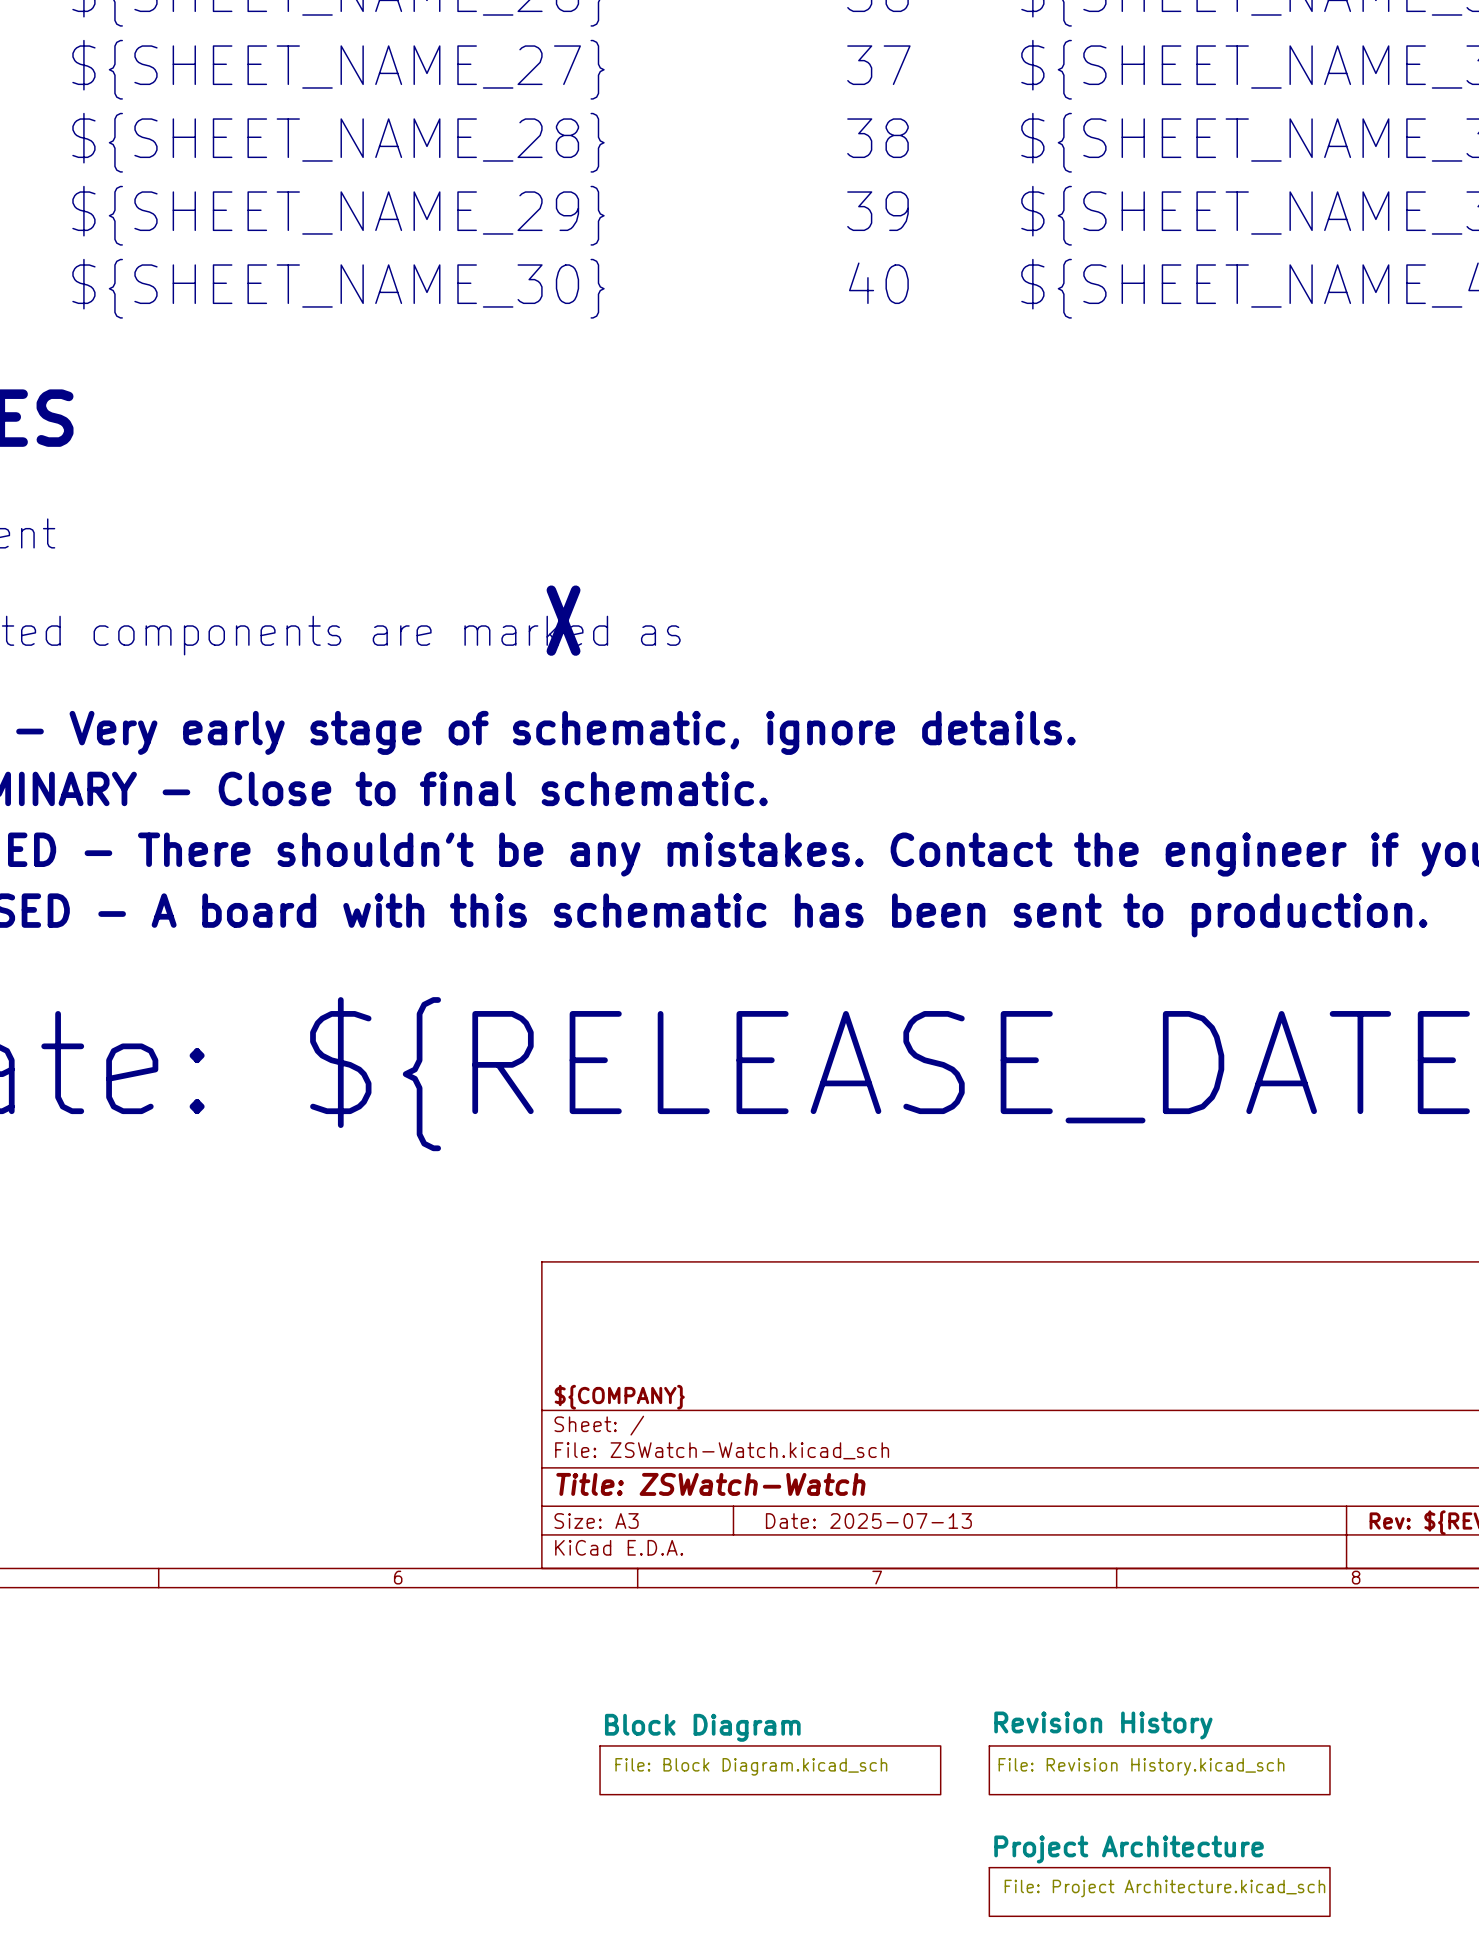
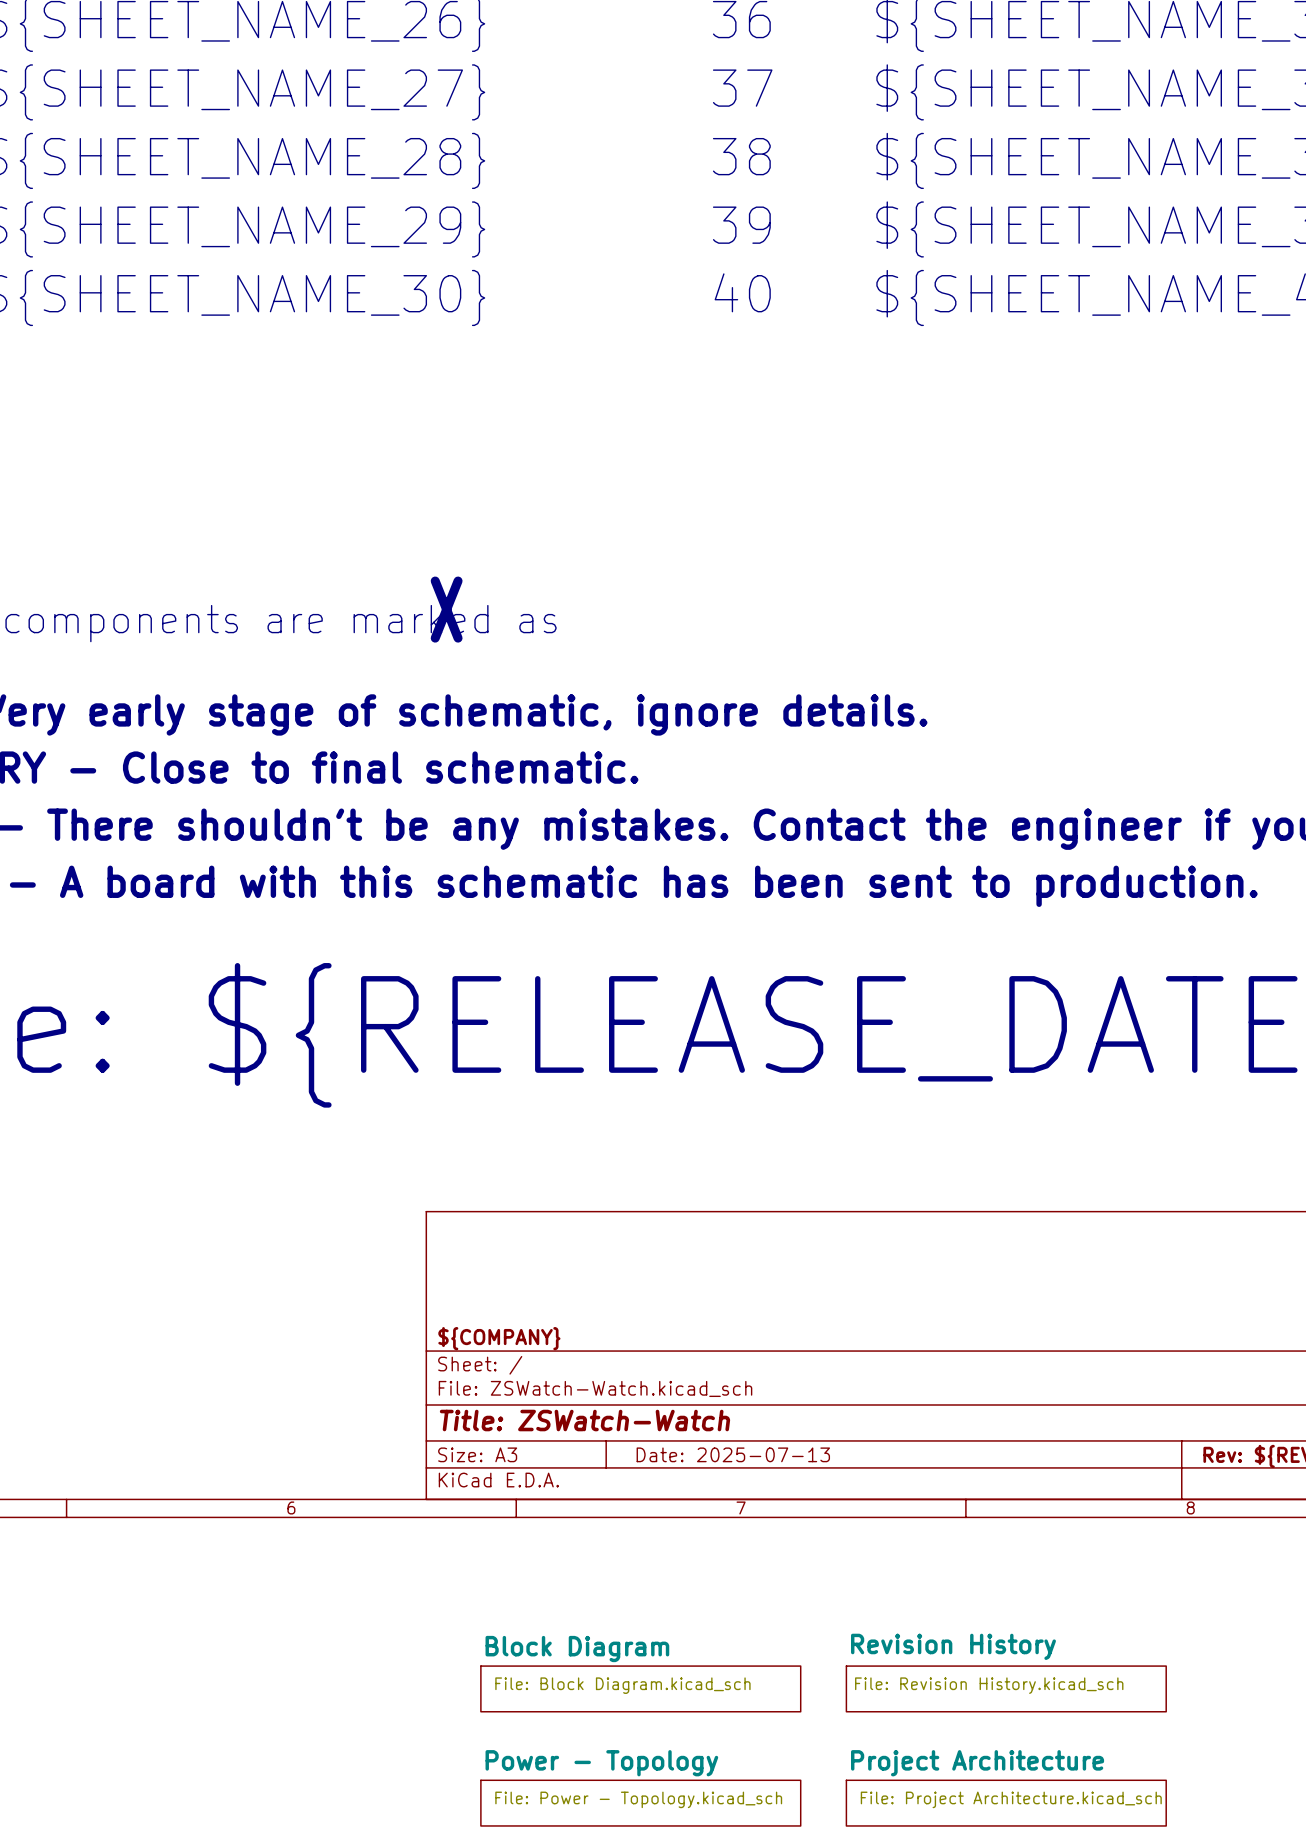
sheet Power - Topology: none -> File: Power - Topology.kicad_sch (640, 1803)

